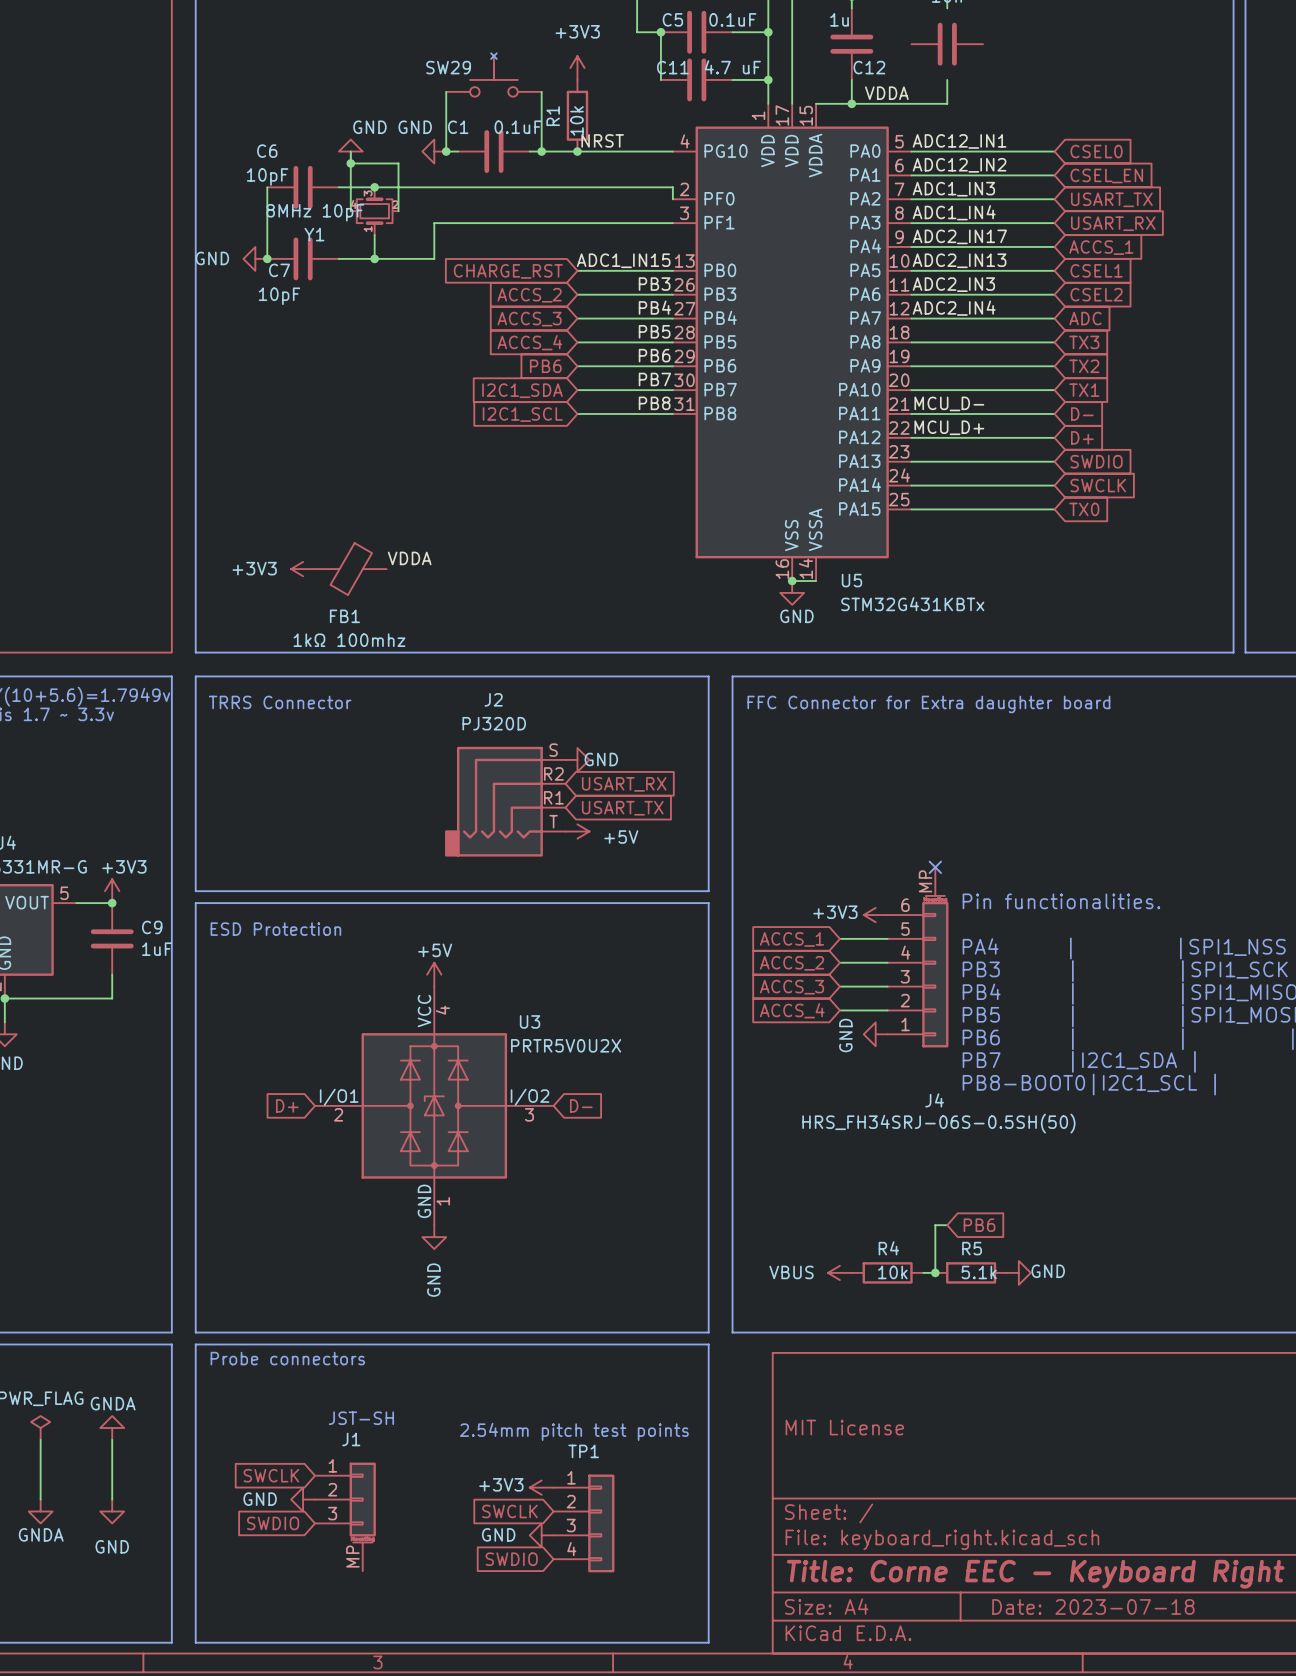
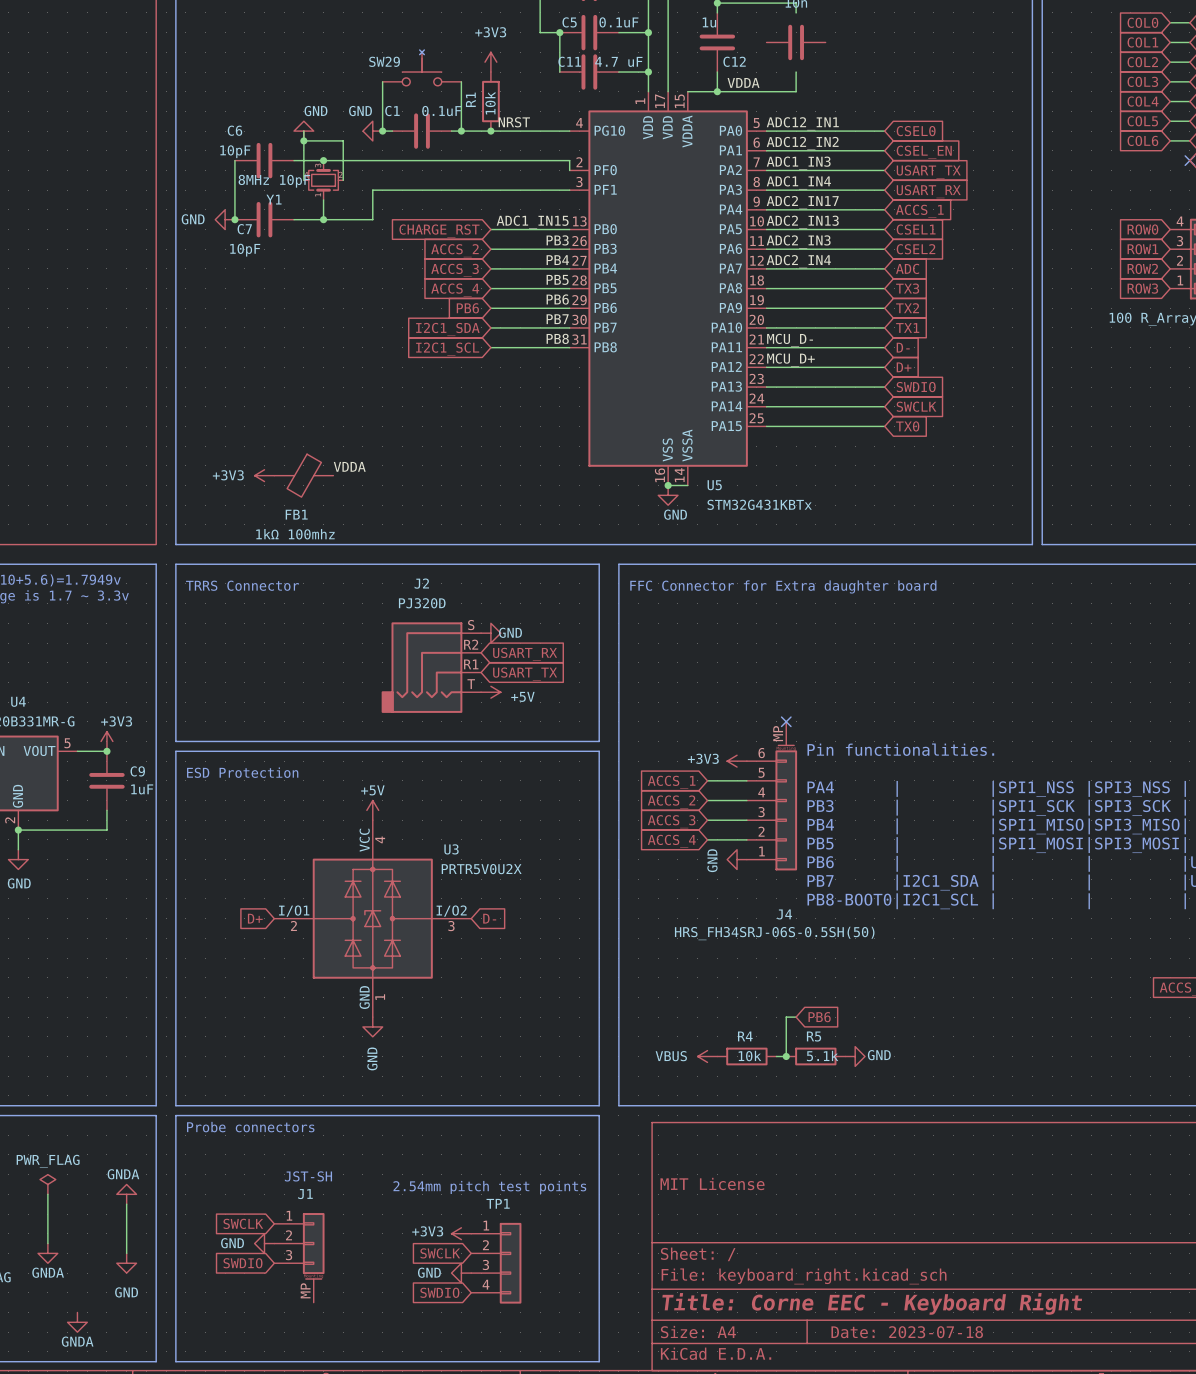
power symbol position: GNDA (112, 1427) -> GNDA (126, 1194)
wire: (112, 1439) (112, 1499) -> (126, 1204) (126, 1253)
power symbol position: GND (112, 1511) -> GND (126, 1263)
power symbol: none -> GNDA (77, 1322)

